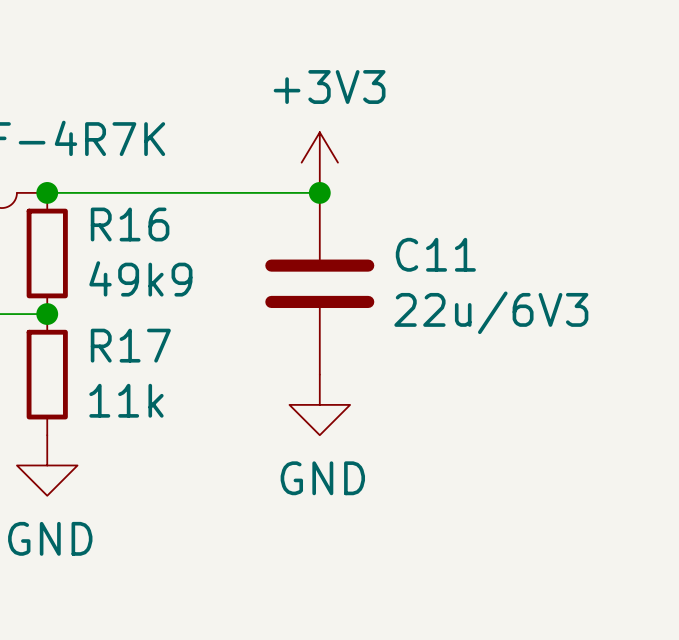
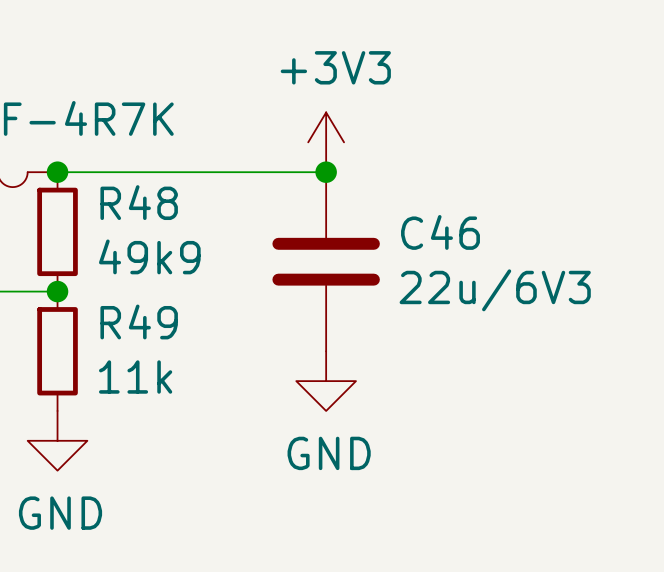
R16 name: R16 (130, 224) -> R48 (139, 202)
C11 name: C11 (435, 254) -> C46 (440, 232)
R17 name: R17 (130, 345) -> R49 (139, 321)

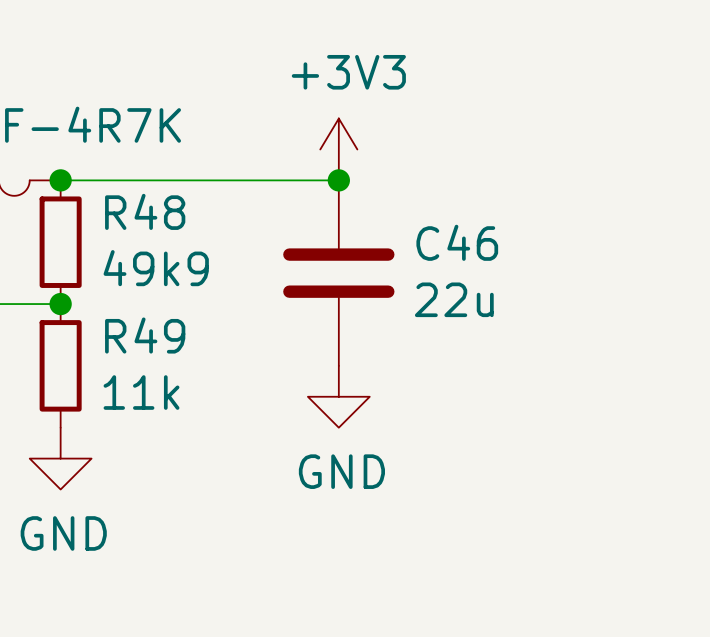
C46 value: 22u/6V3 (495, 290) -> 22u (454, 299)

